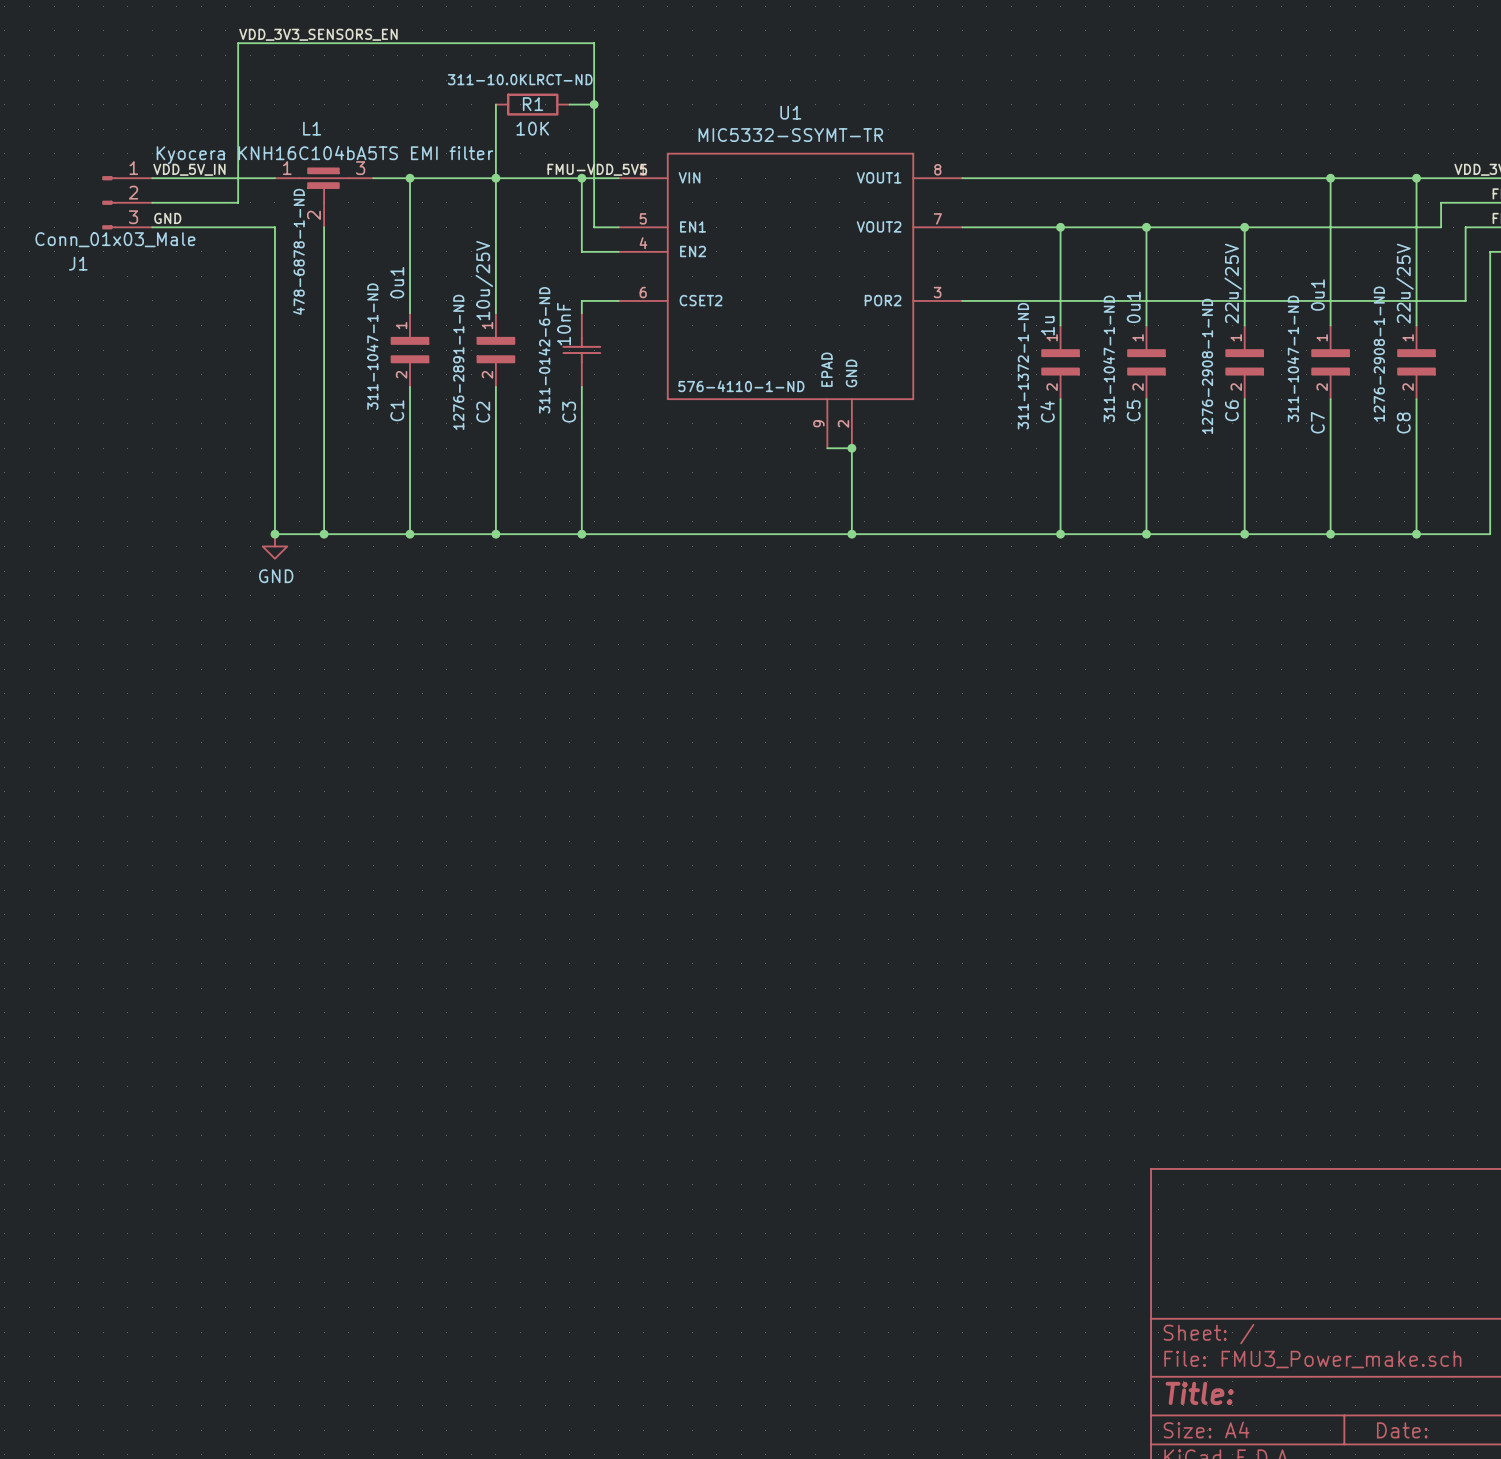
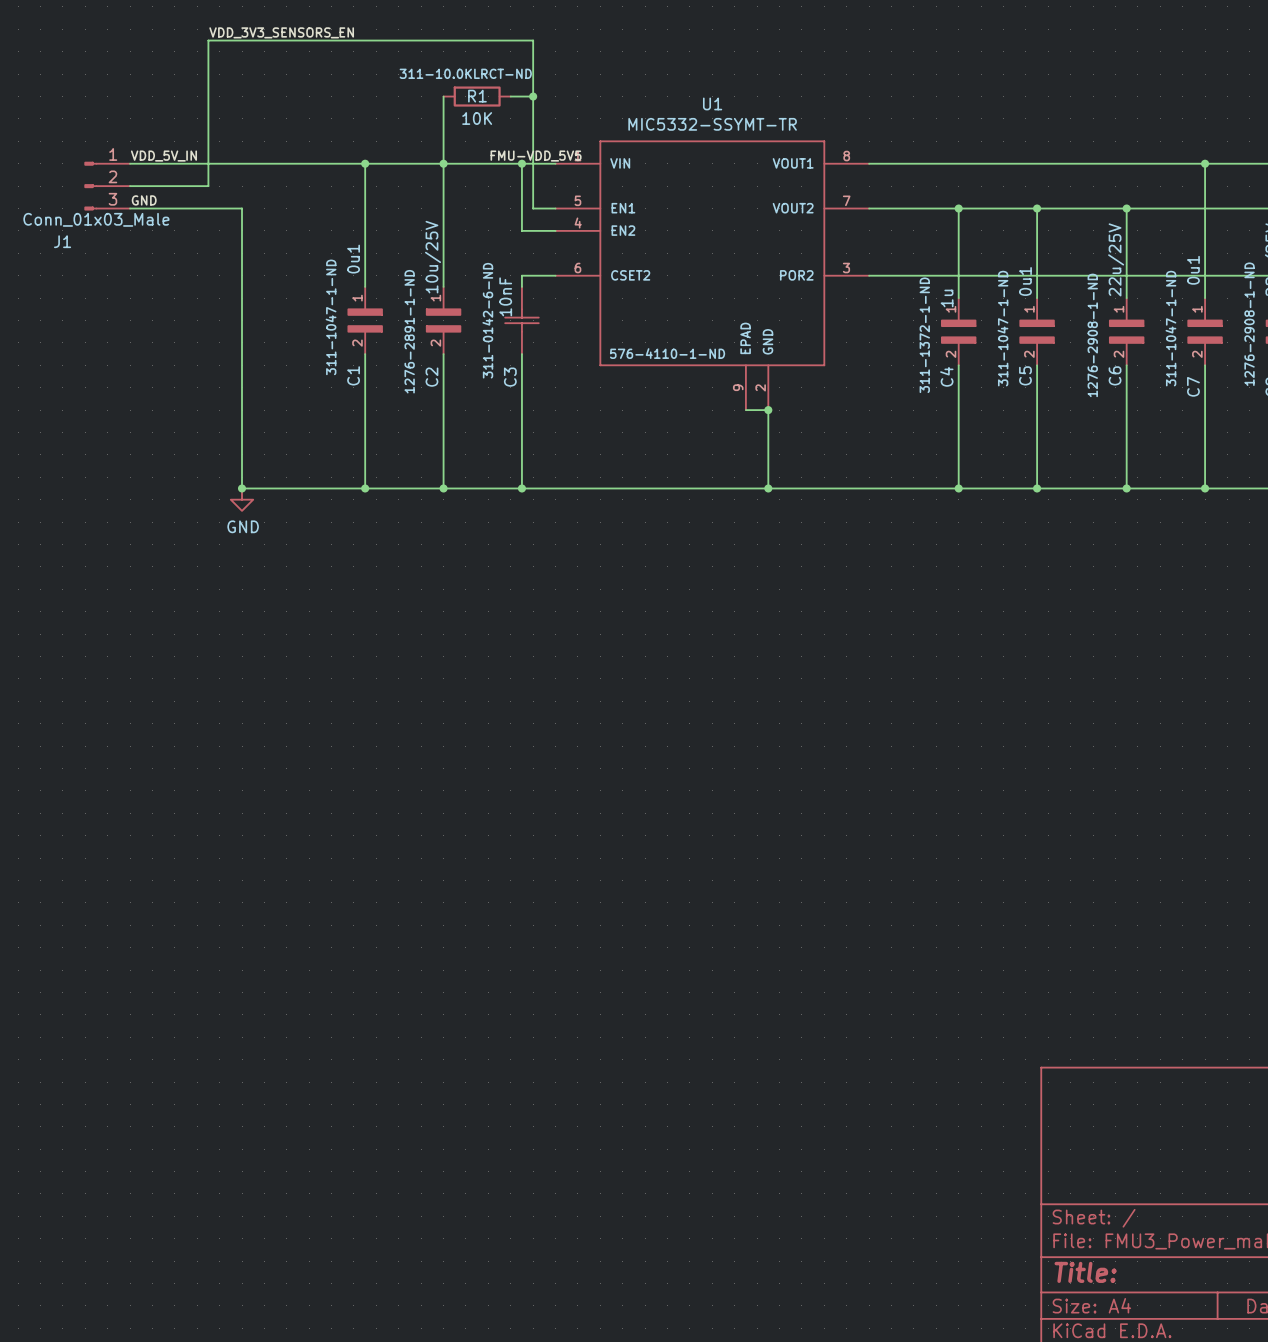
L1: Kyocera KNH16C104bA5TS EMI filter (324, 197) -> none
wire: (324, 227) (324, 534) -> none
junction: (324, 534) -> none

